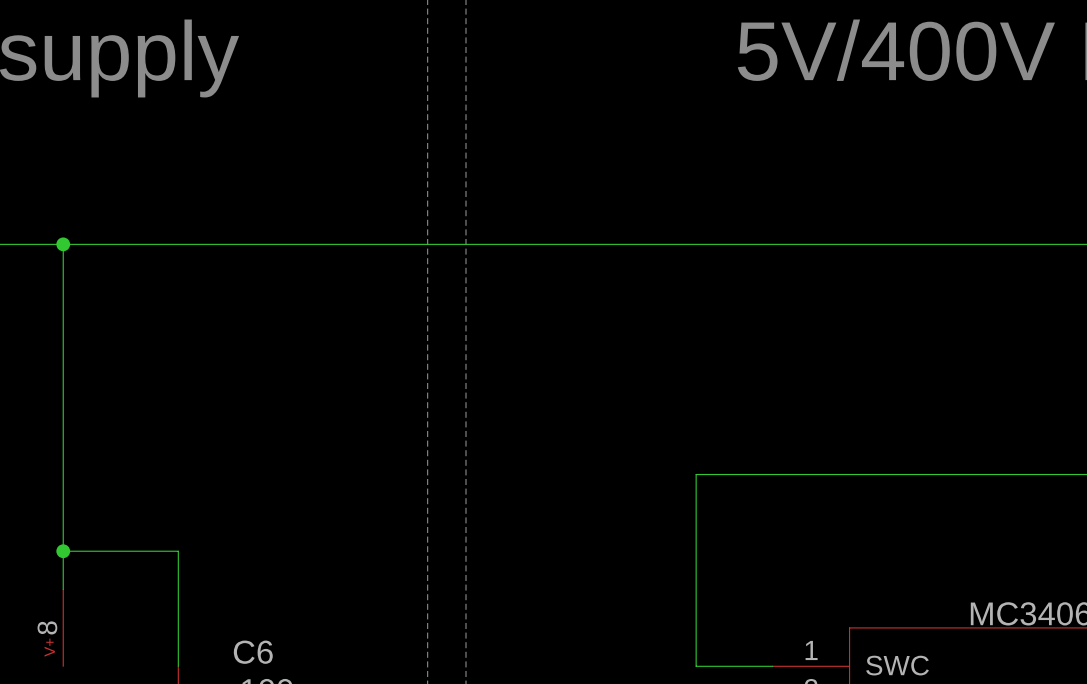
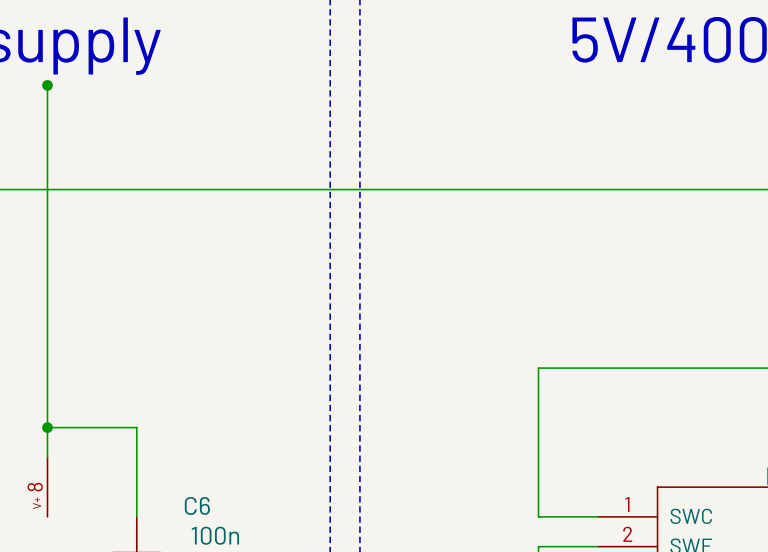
wire: none -> (47, 85) (47, 189)
junction: none -> (47, 85)
junction: (63, 244) -> none

